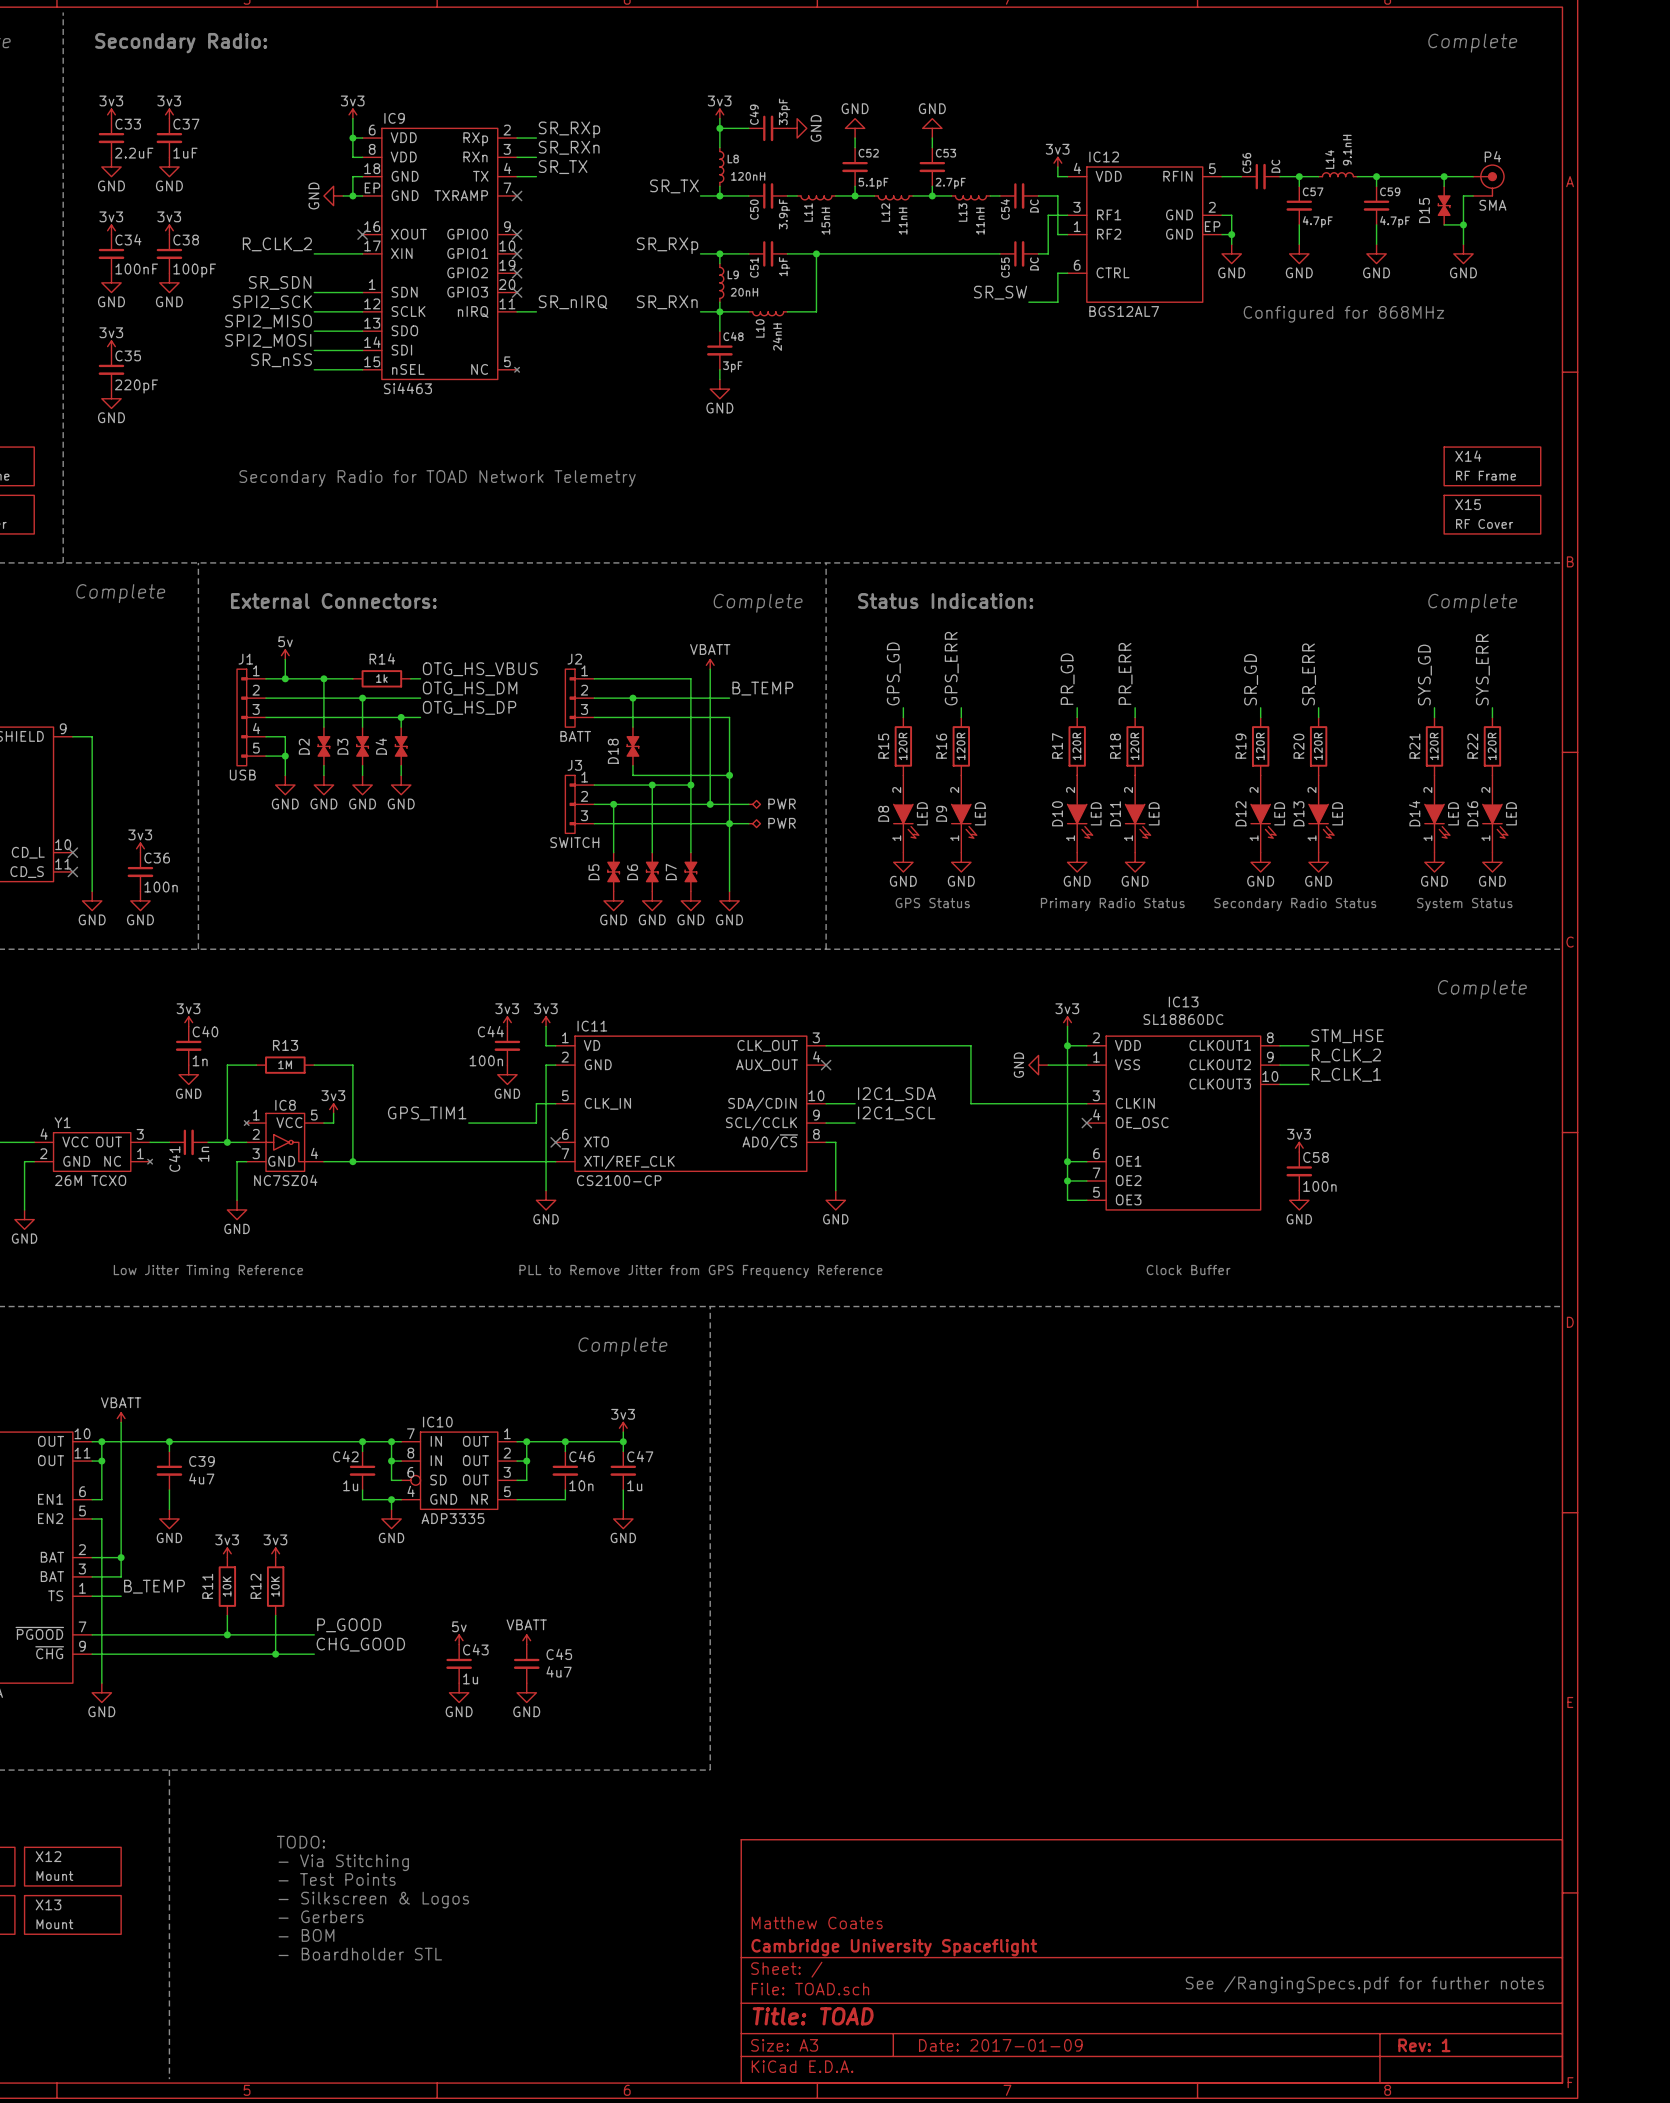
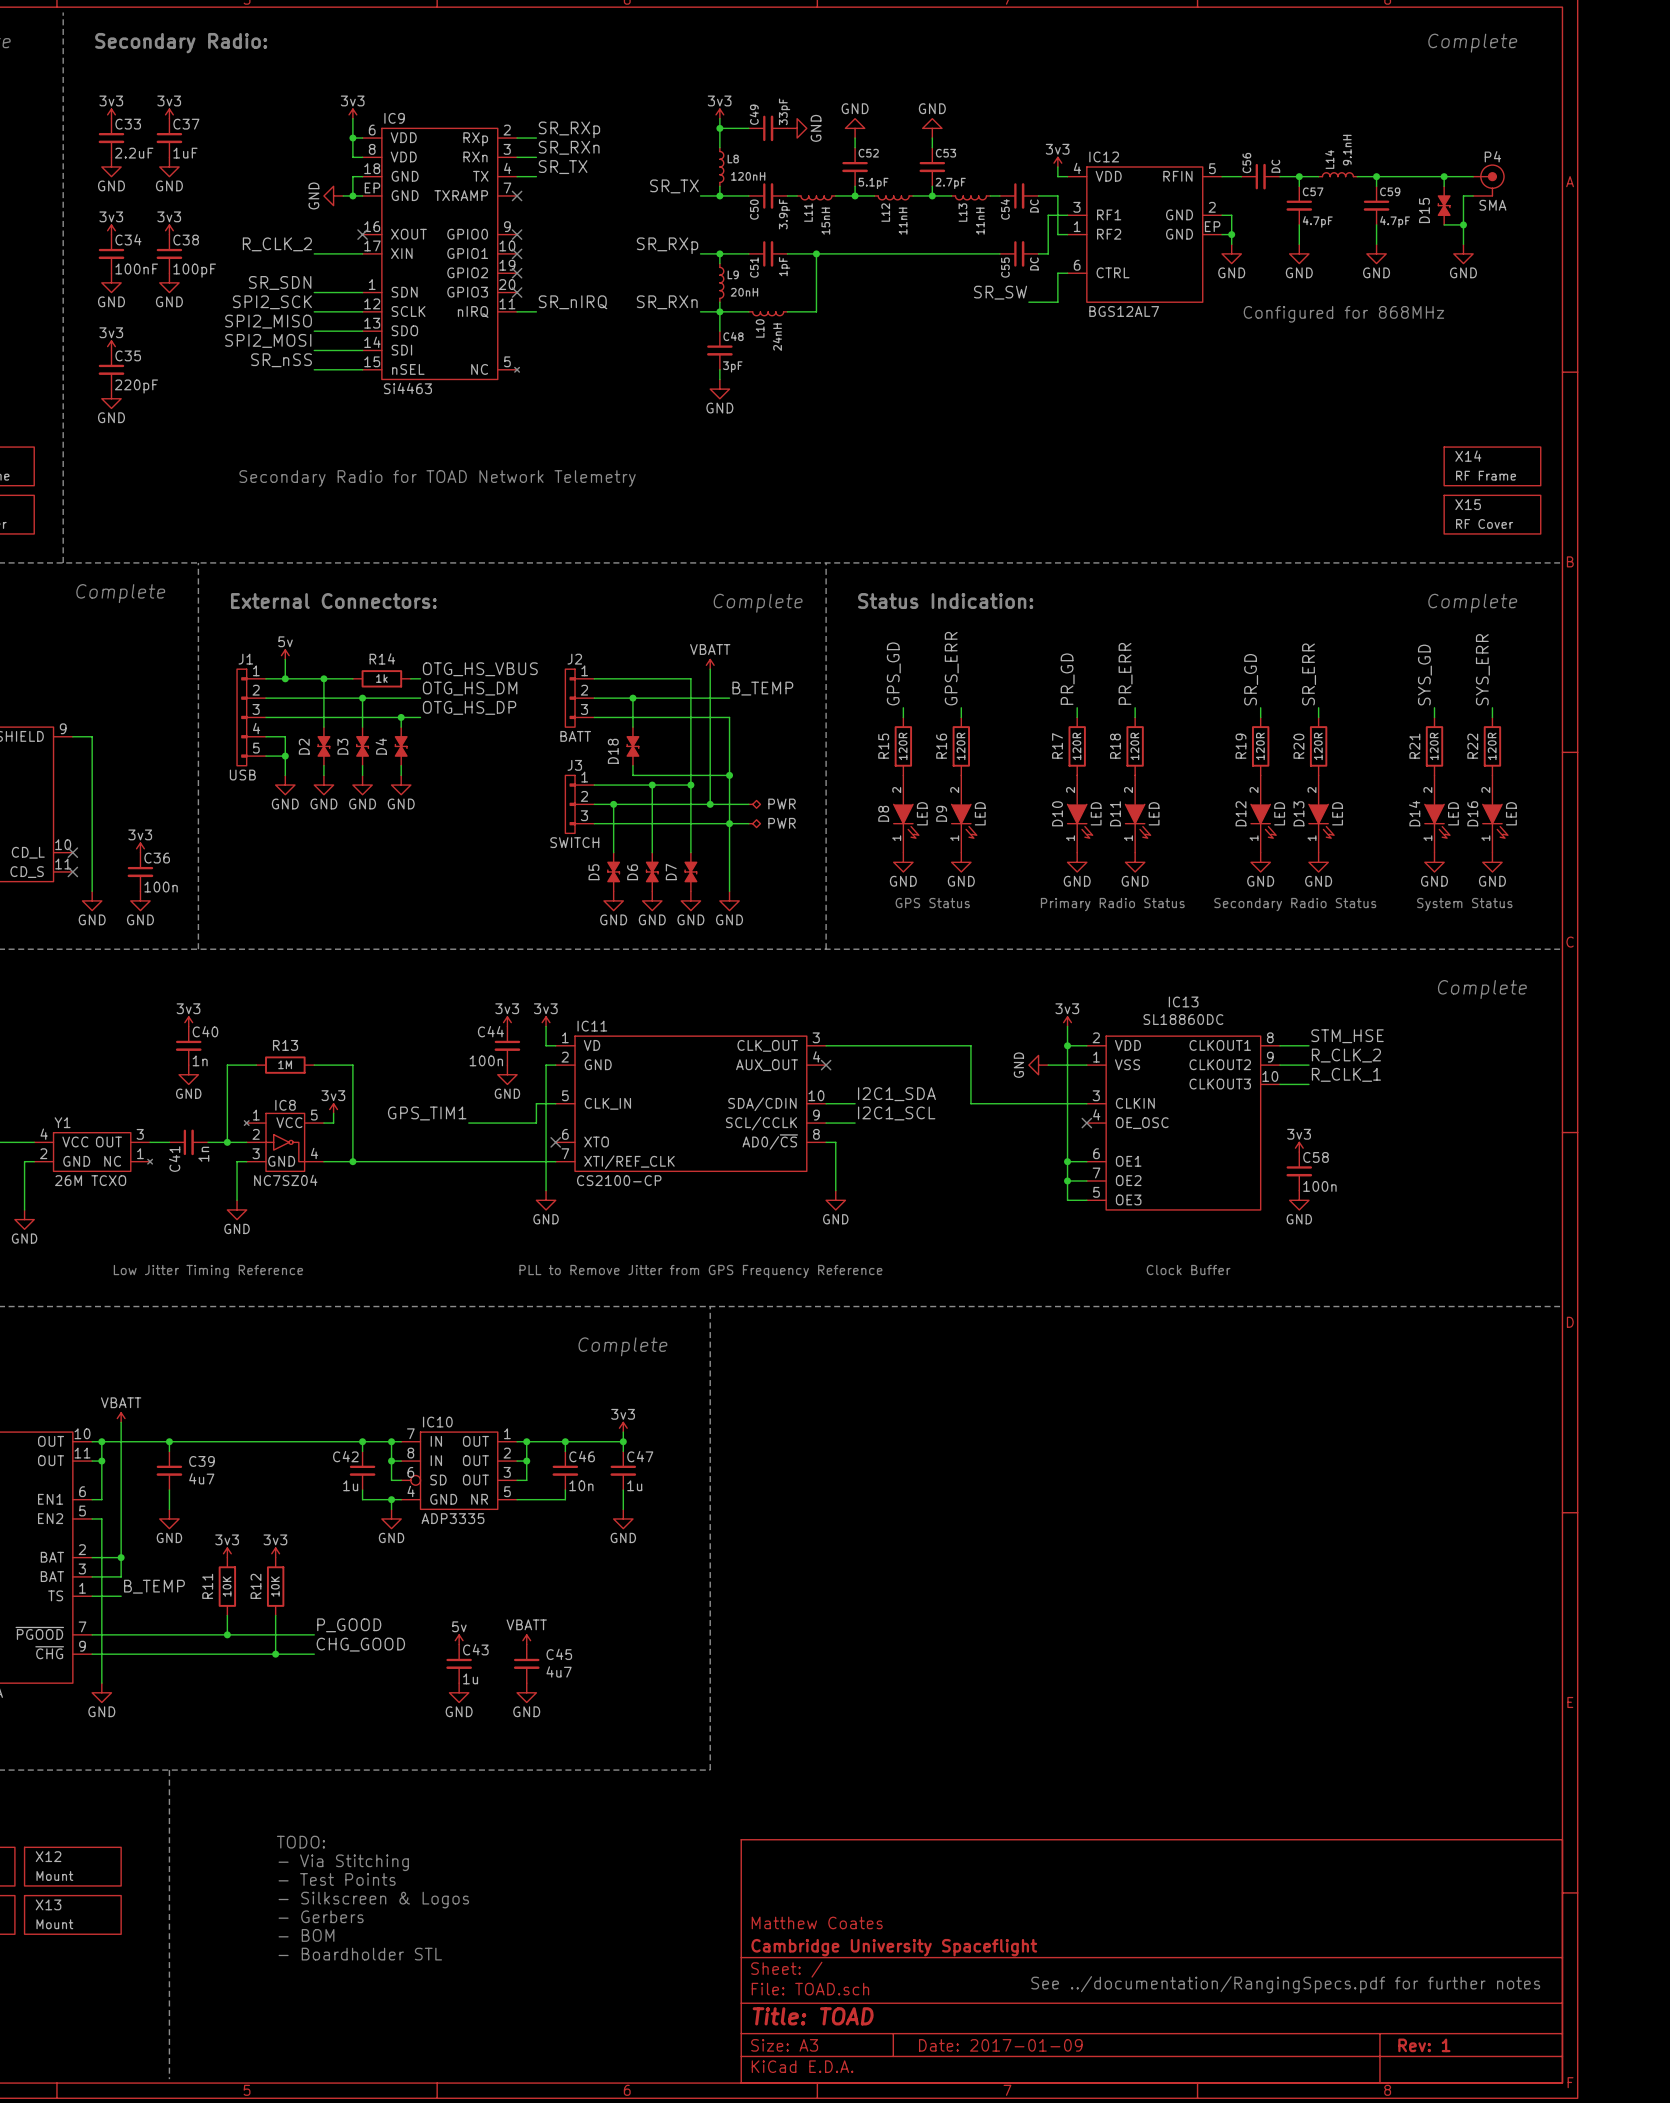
text: See /RangingSpecs.pdf for further notes (1364, 1984) -> See ../documentation/RangingSpecs.pdf for further notes (1285, 1984)

